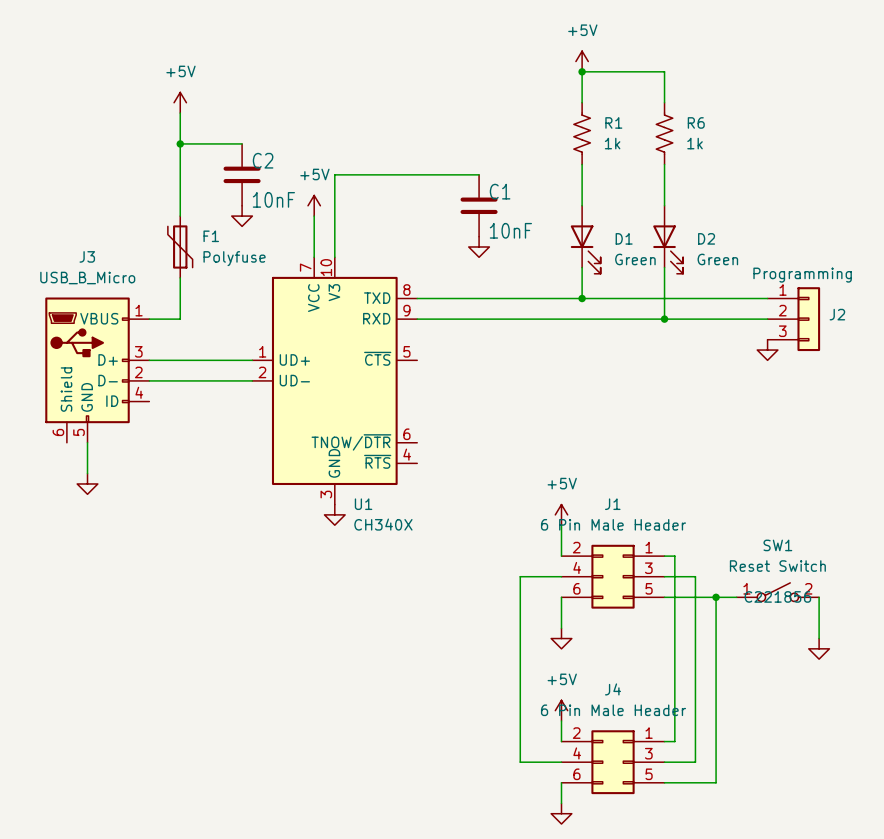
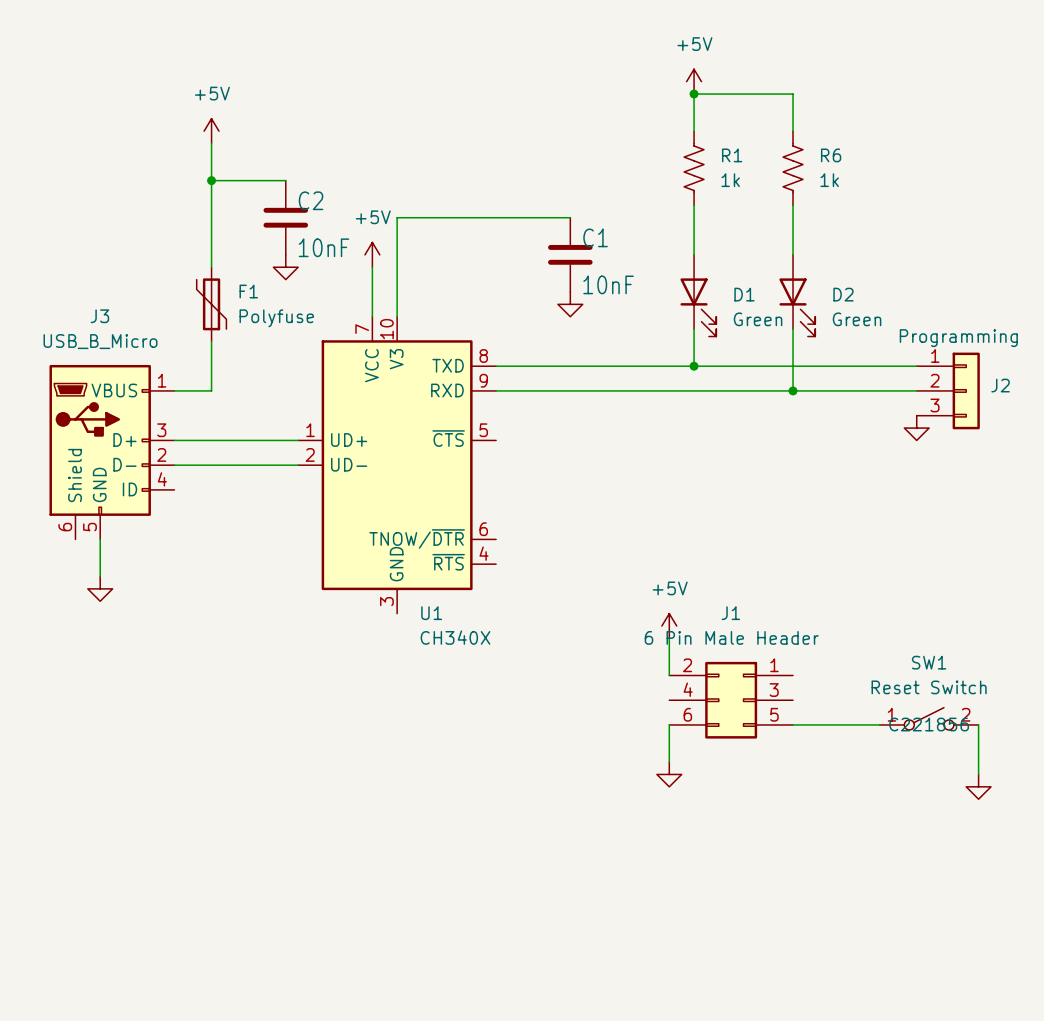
power symbol: (334, 514) -> none
wire: (664, 556) (674, 556) (674, 741) (664, 741) -> none
wire: (561, 576) (520, 576) (520, 762) (561, 762) -> none
wire: (664, 576) (695, 576) (695, 762) (664, 762) -> none
wire: (716, 597) (716, 782) (664, 782) -> none
junction: (716, 597) -> none
power symbol: +5V (561, 710) -> none
wire: (561, 720) (561, 741) -> none
J4: 6 Pin Male Header (613, 762) -> none
wire: (561, 782) (561, 803) -> none
power symbol: (561, 813) -> none

